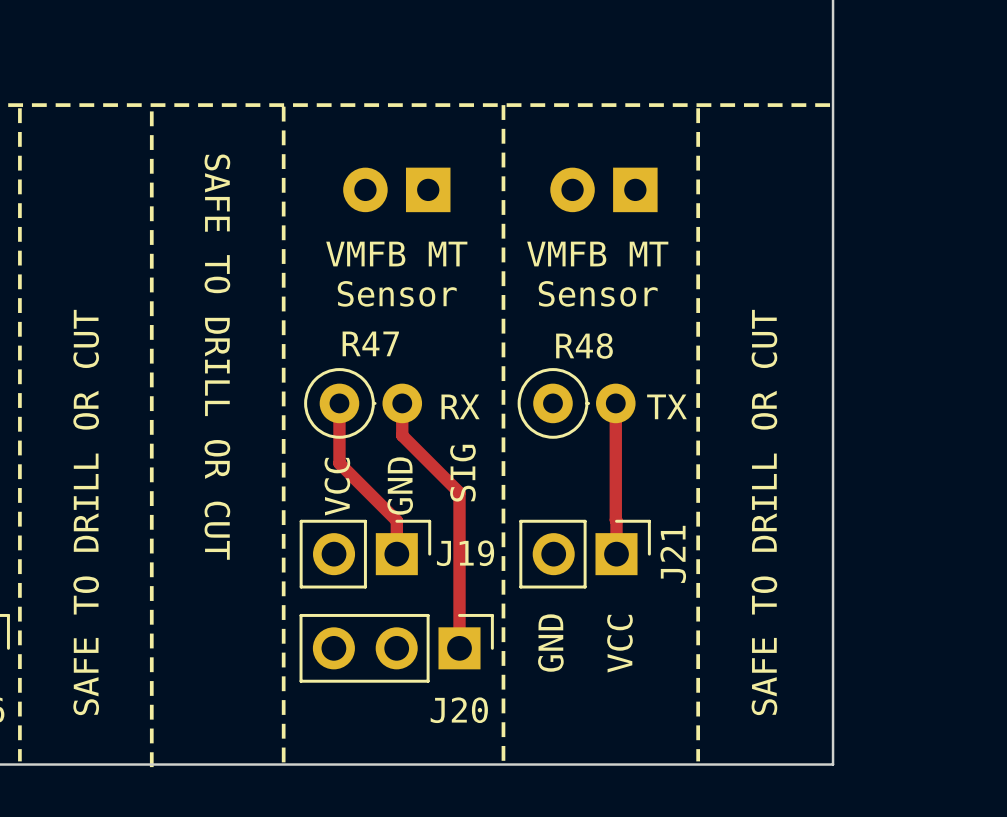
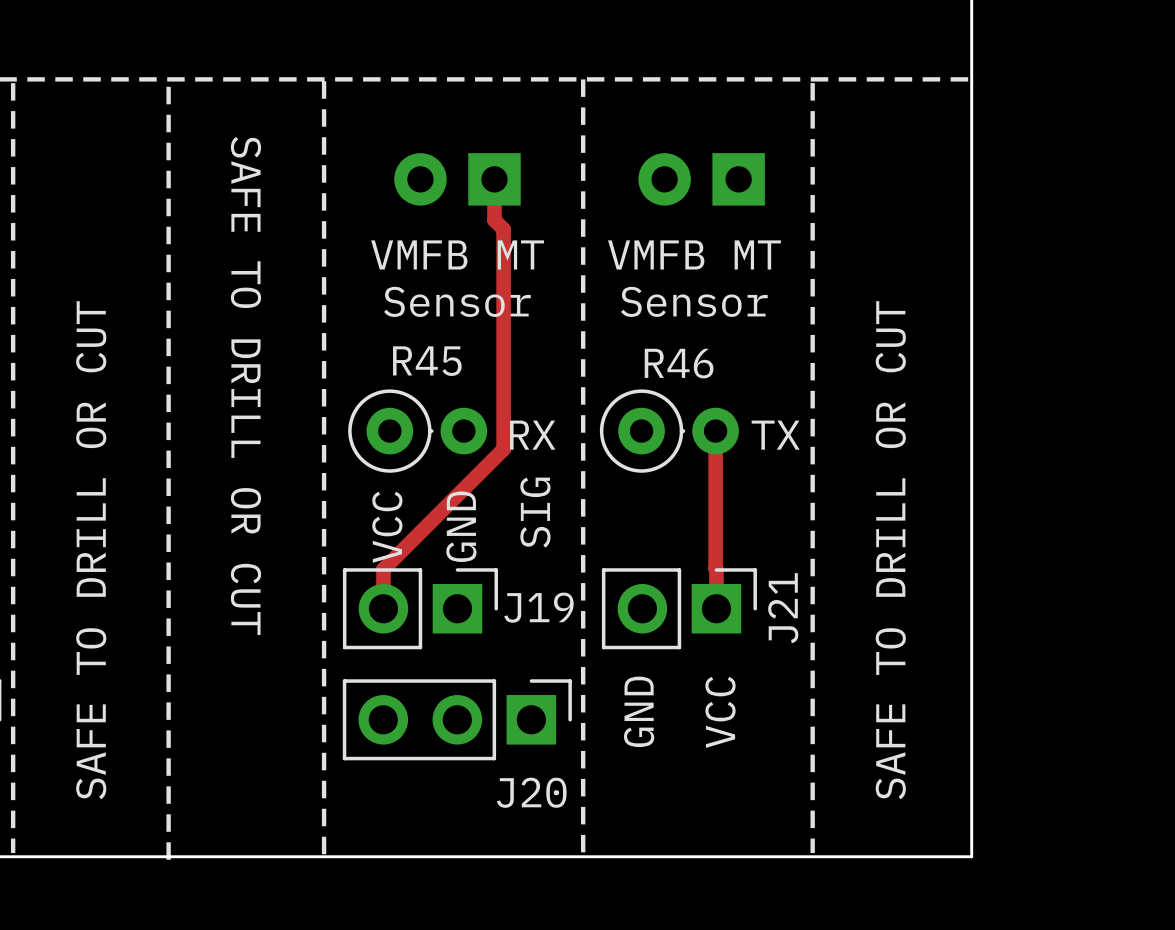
track: none -> (494, 179) (494, 220) (503, 229) (503, 449) (383, 569) (383, 608)
R47 name: R47 (370, 343) -> R45 (427, 361)
R48 name: R48 (584, 345) -> R46 (679, 363)
track: (339, 403) (339, 463) (396, 520) (396, 554) -> none
track: (402, 403) (402, 435) (459, 492) (459, 648) -> none

